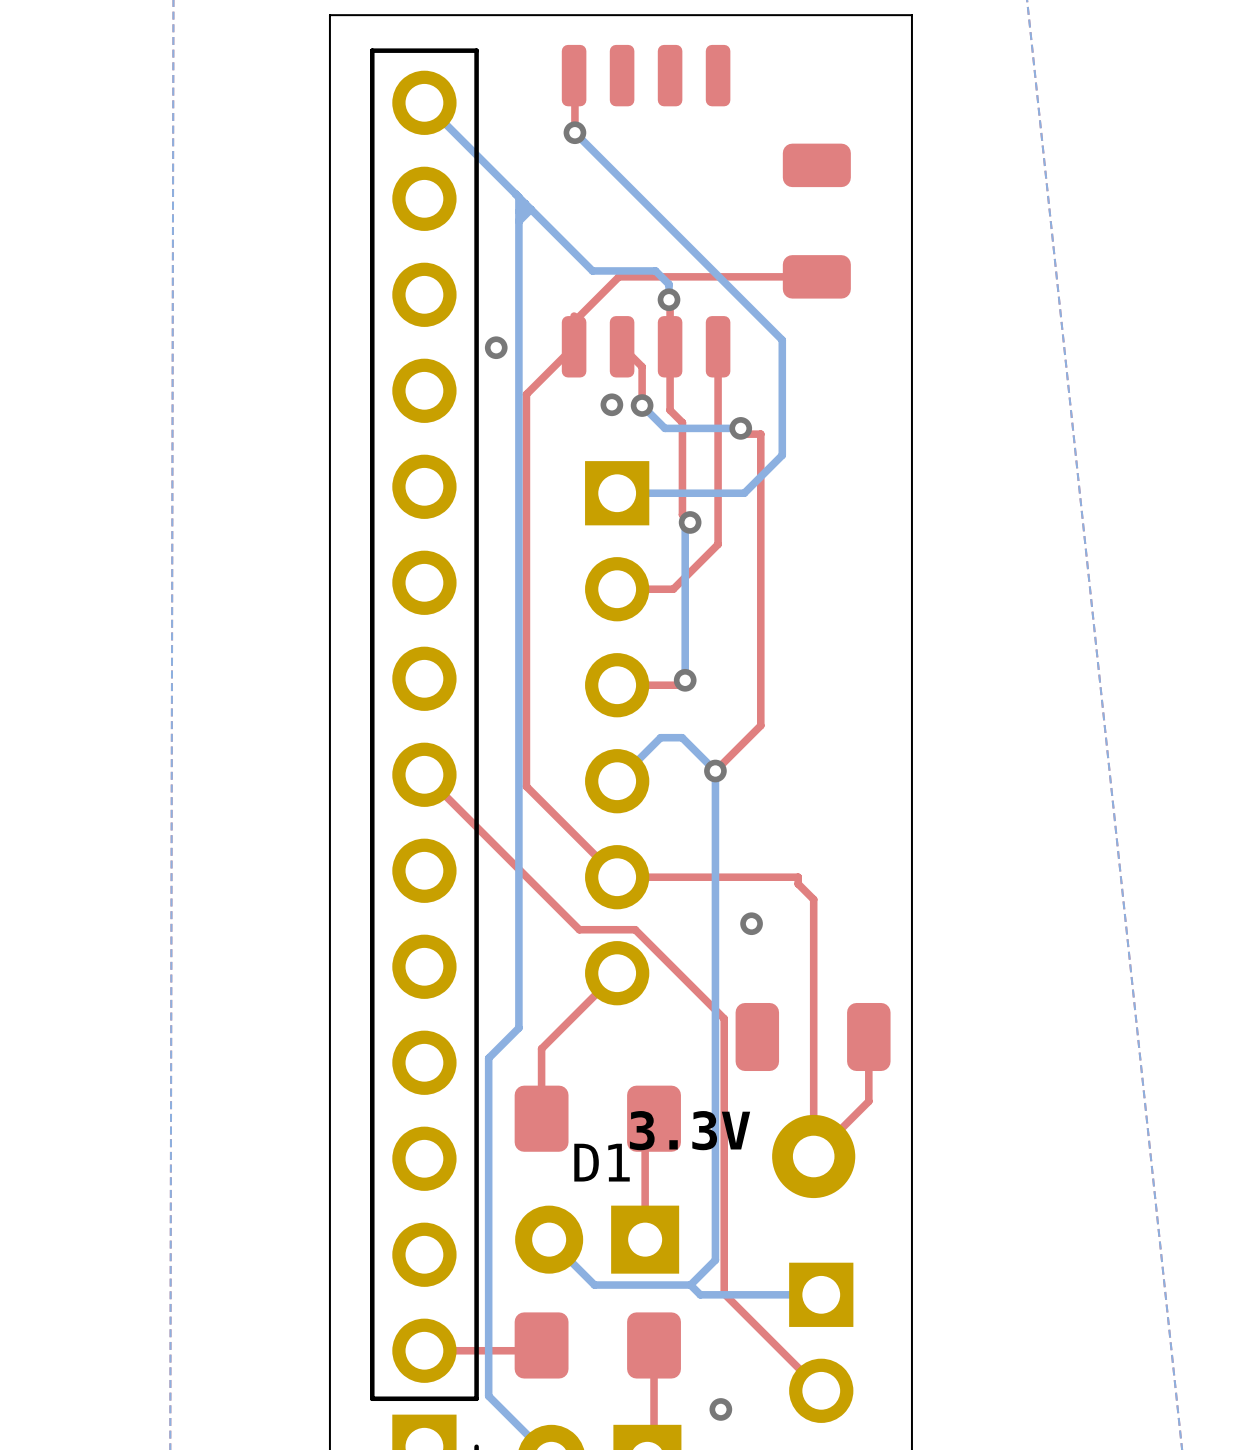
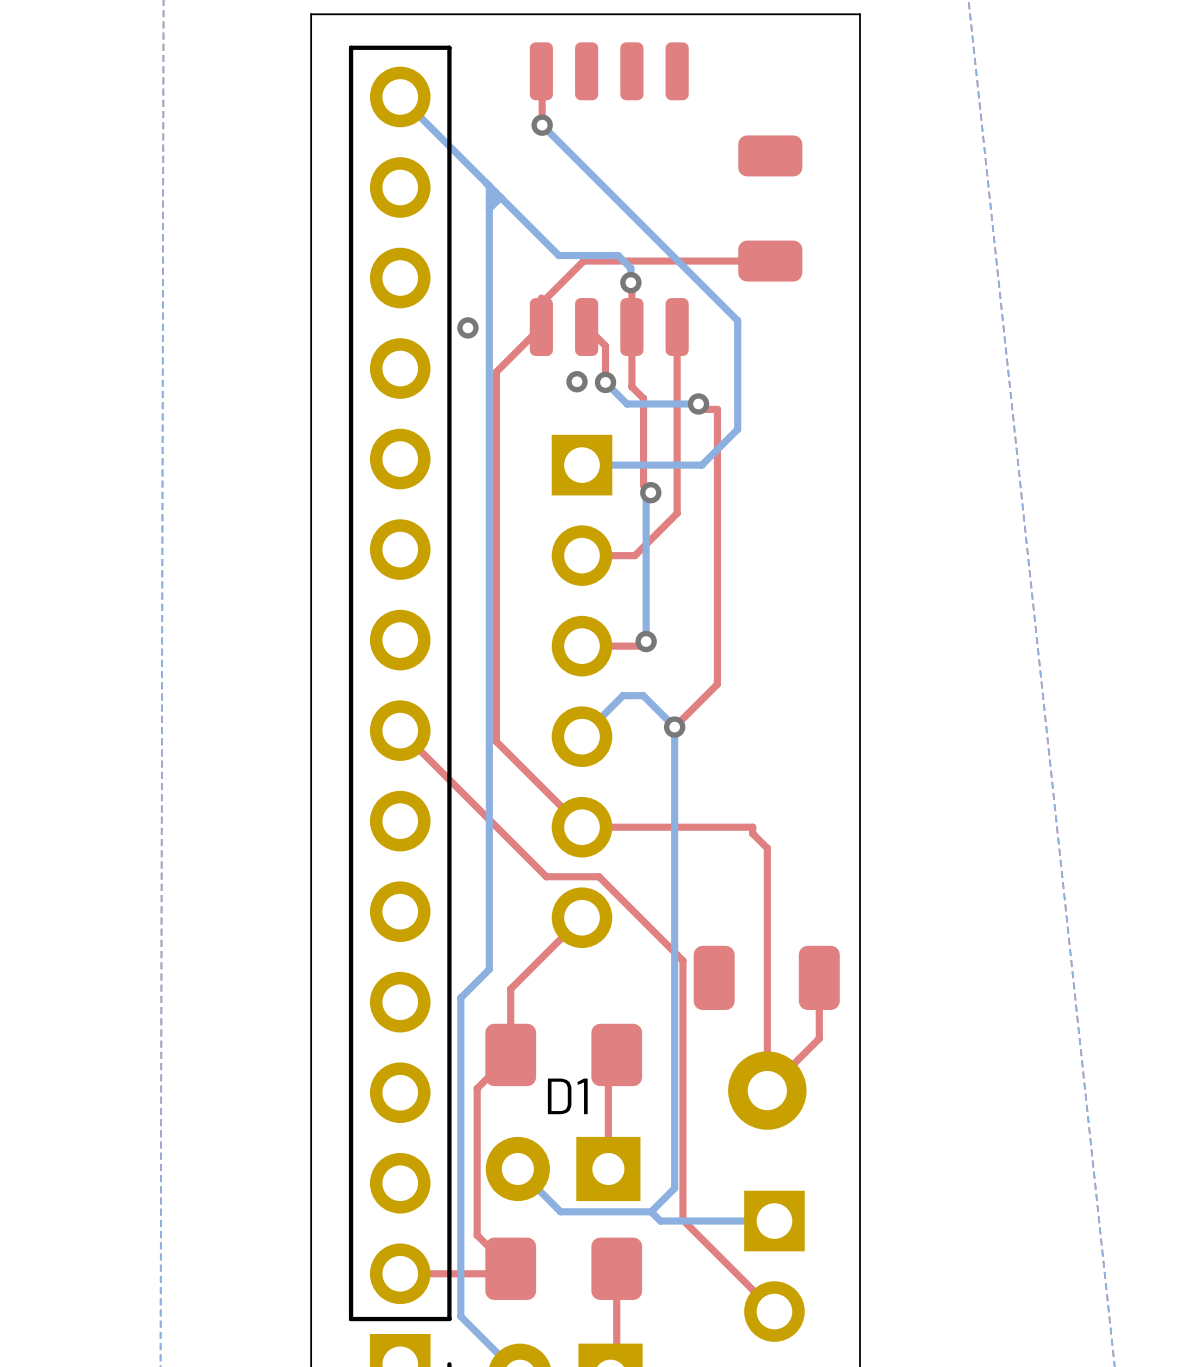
via: (751, 923) -> none
top track: none -> (510, 1054) (477, 1088) (477, 1235) (510, 1268)
text: 3.3V (690, 1130) -> none
via: (720, 1409) -> none

